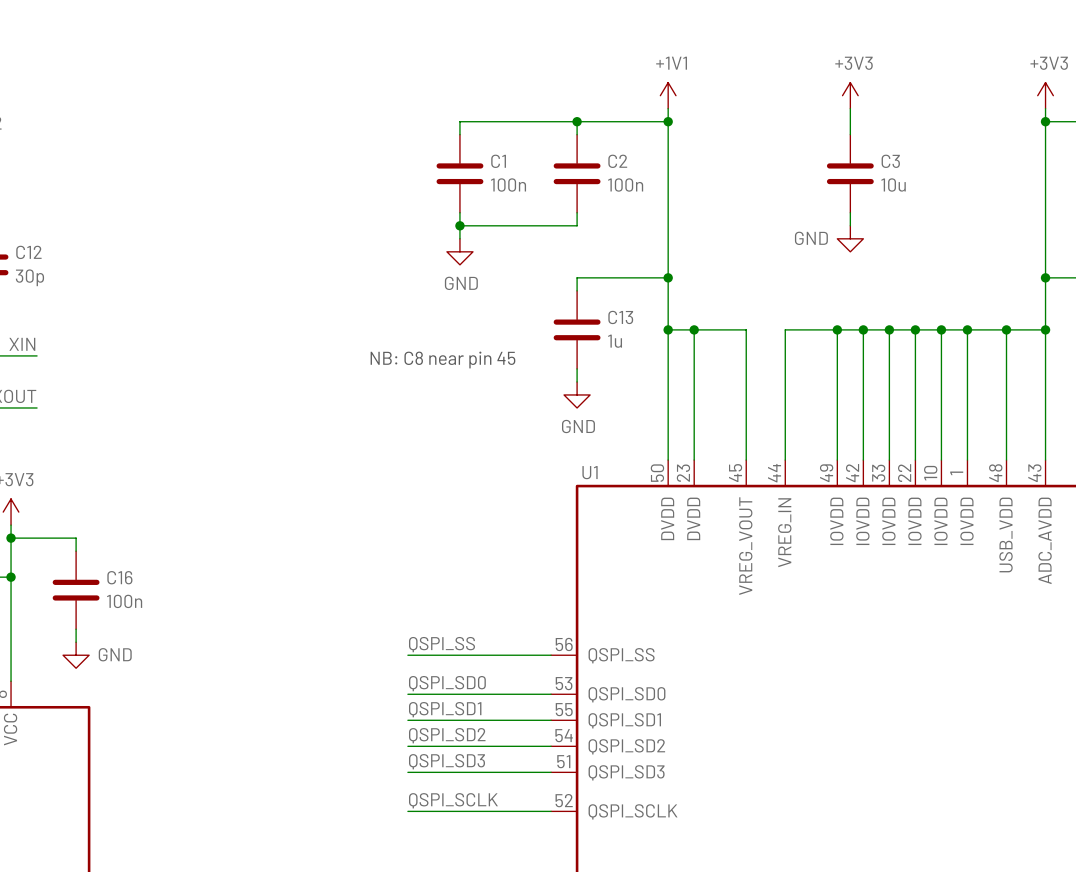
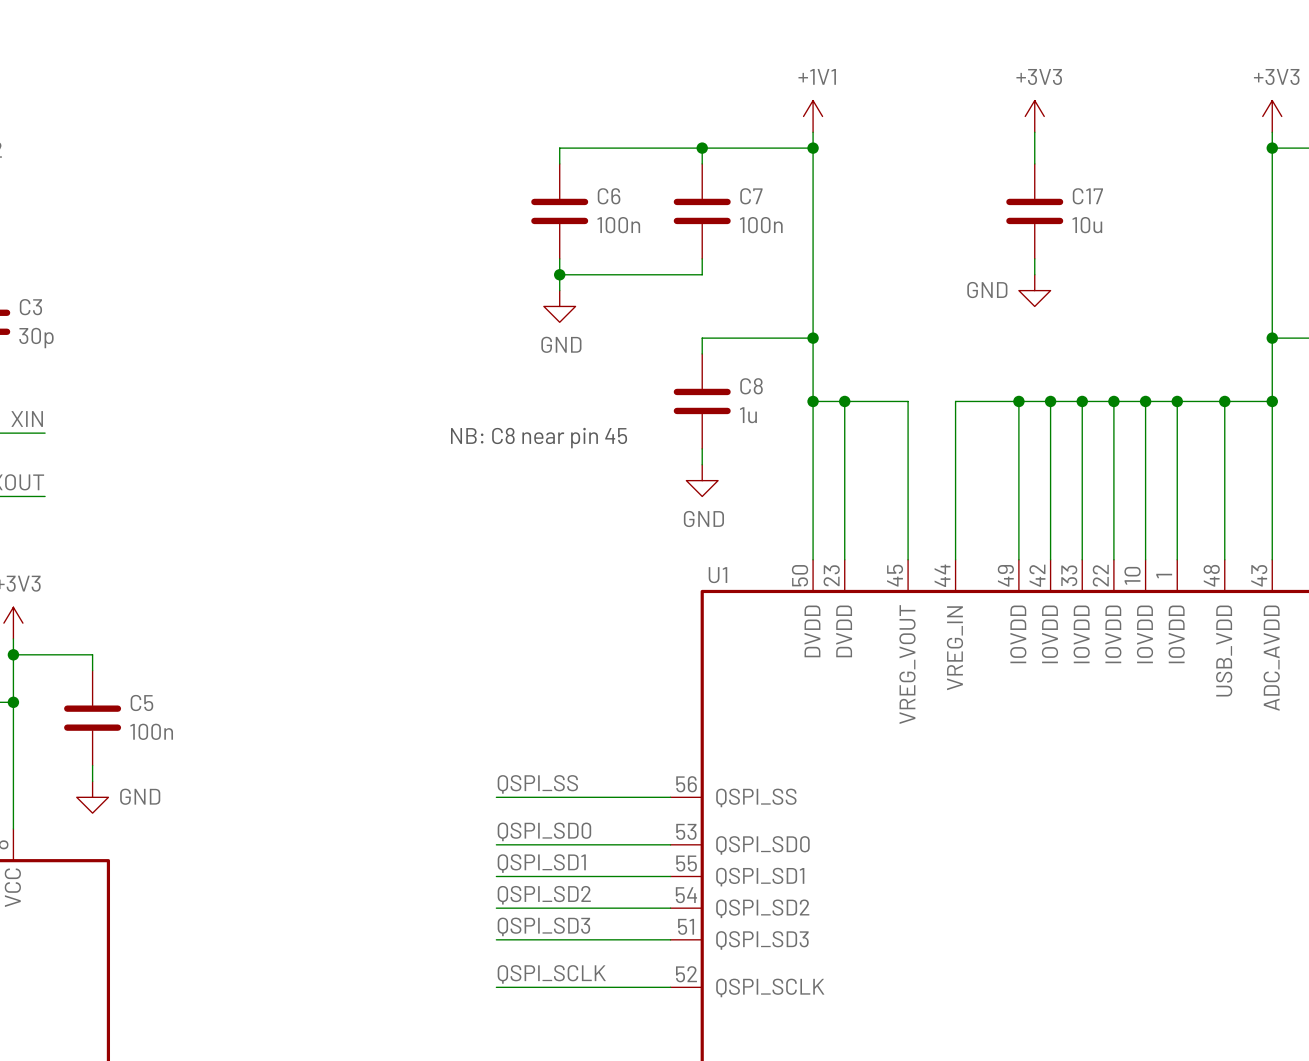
C1 name: C1 (498, 161) -> C6 (609, 196)
C2 name: C2 (617, 161) -> C7 (751, 196)
C3 name: C3 (890, 161) -> C17 (1087, 196)
C12 name: C12 (28, 252) -> C3 (30, 307)
C13 name: C13 (620, 317) -> C8 (751, 386)
C16 name: C16 (119, 577) -> C5 (141, 703)

